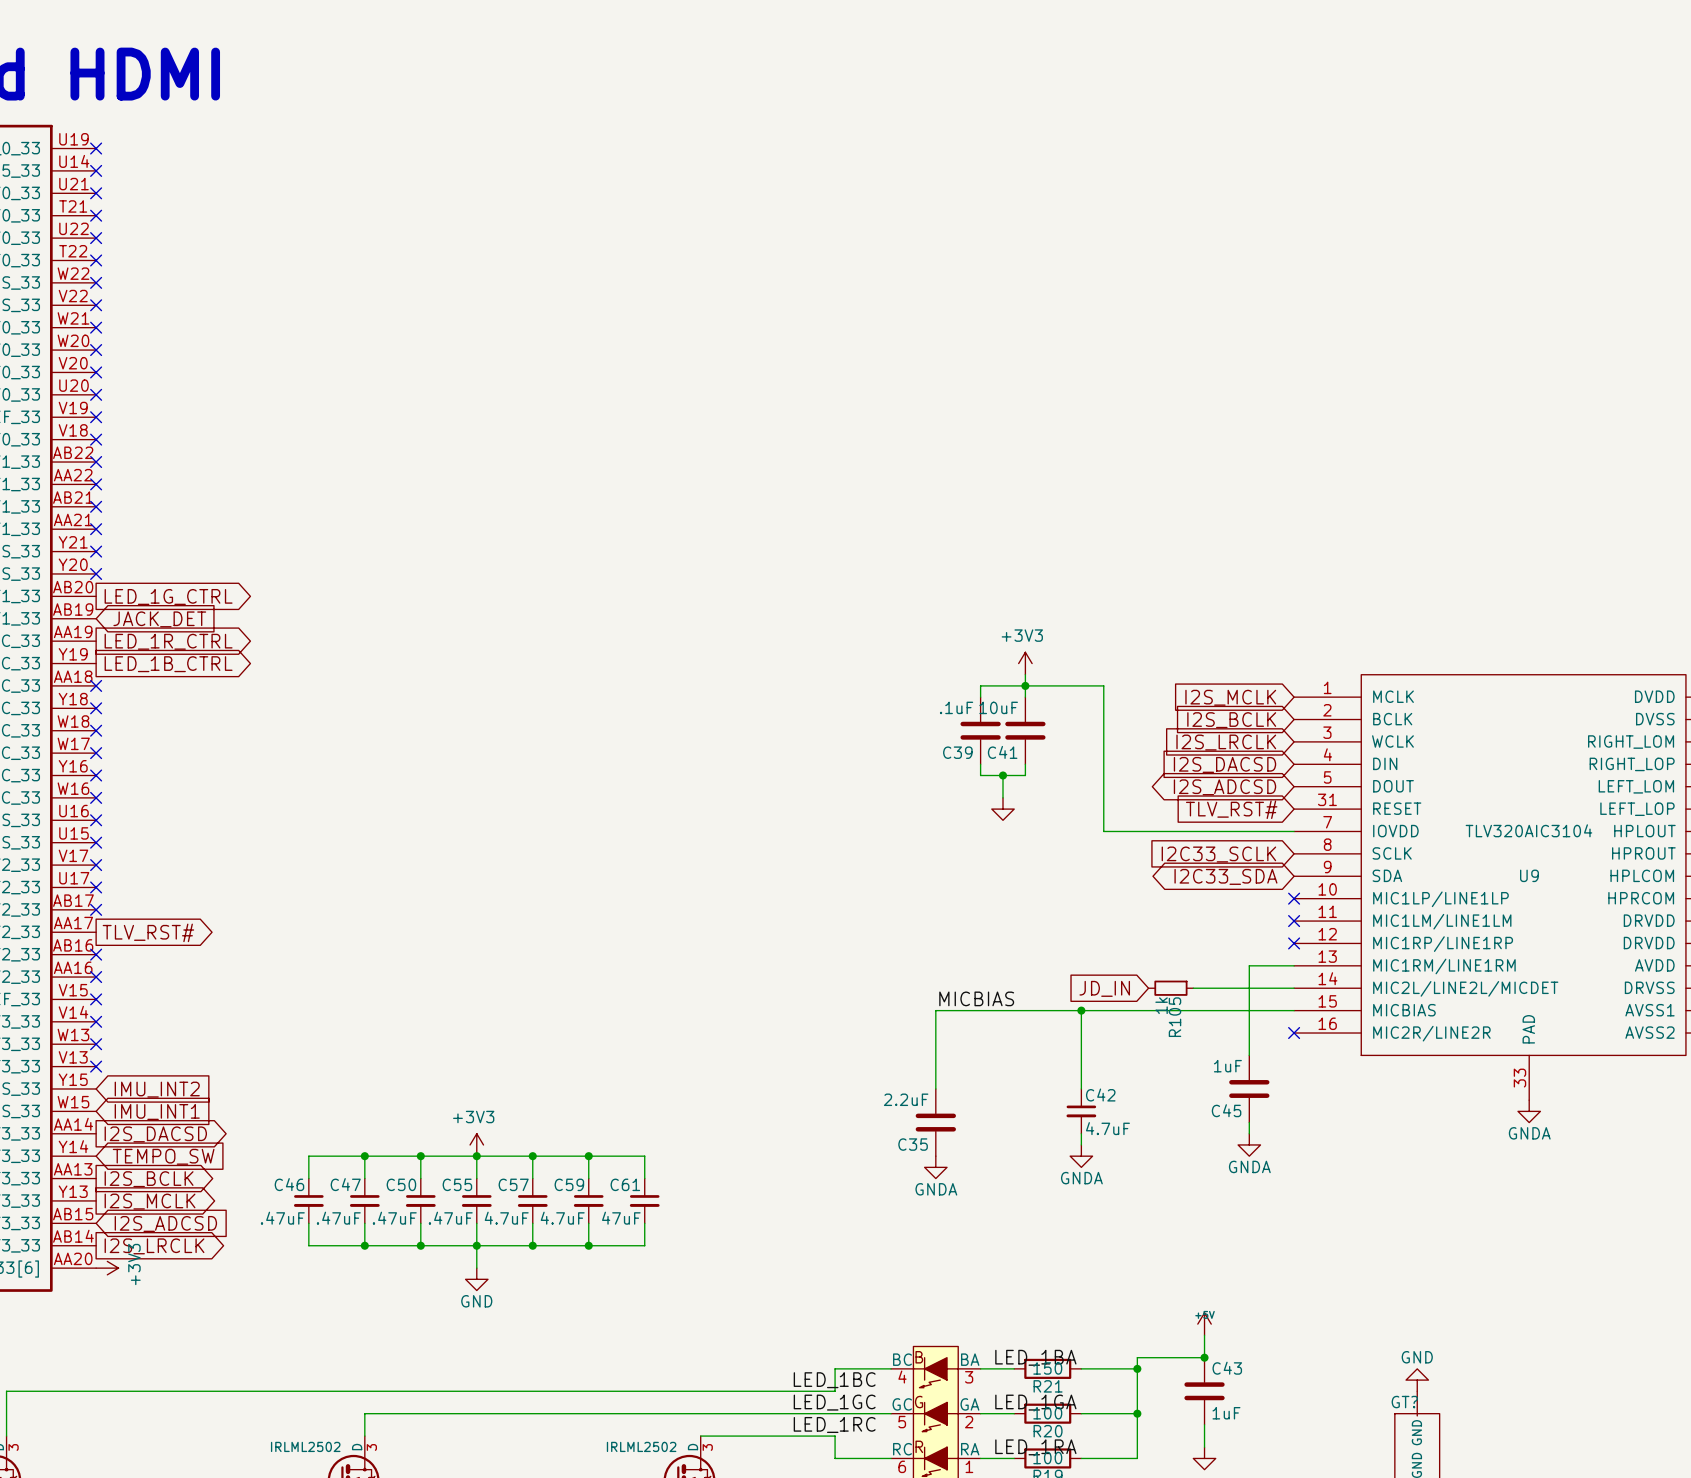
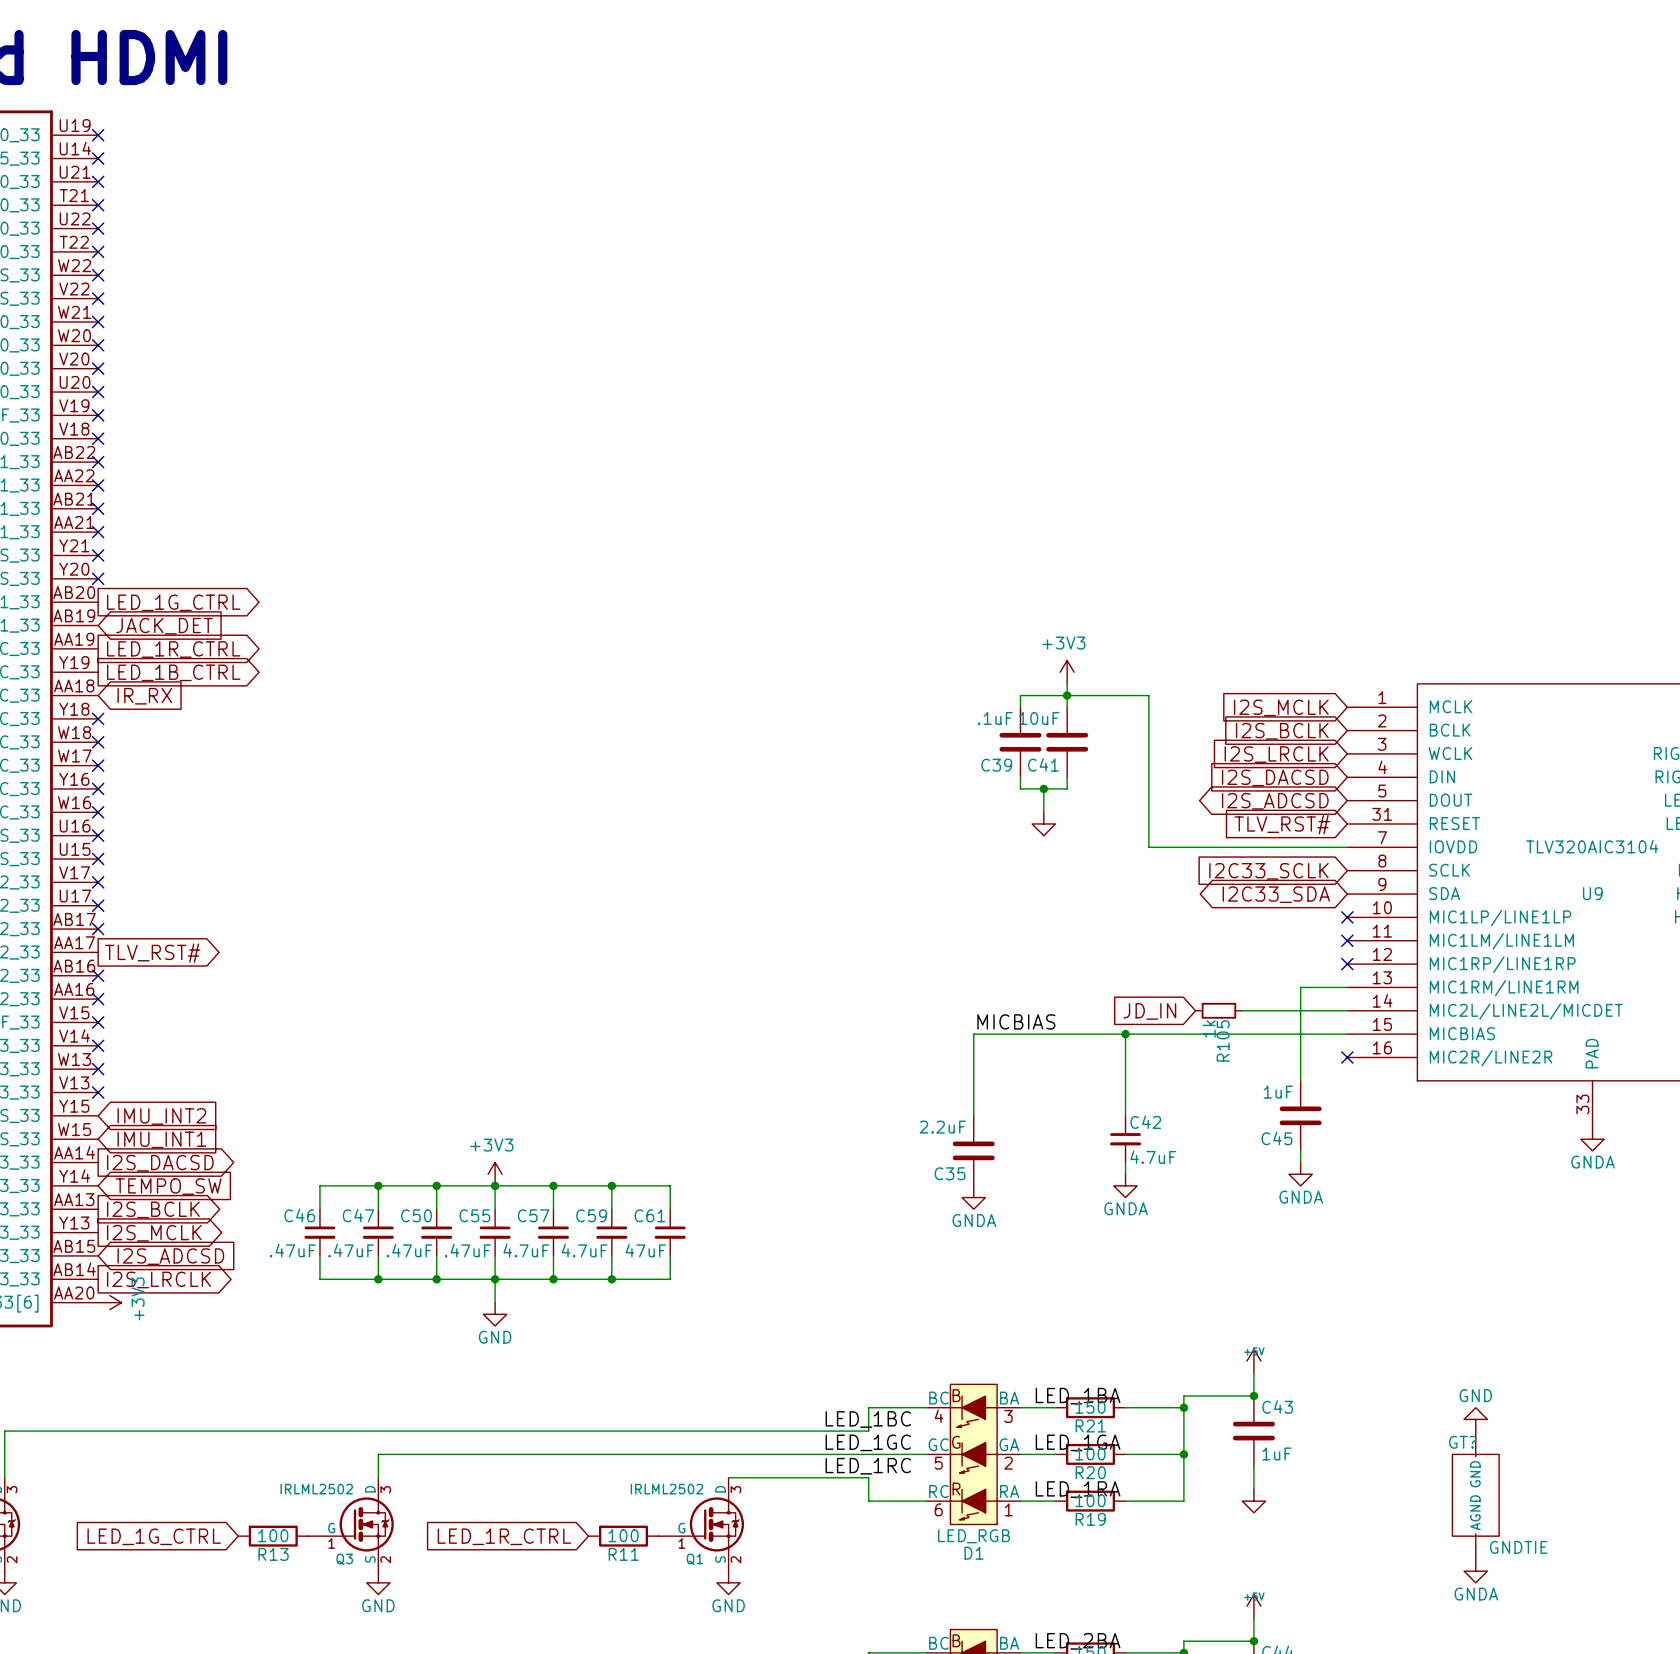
no-connect mark: (96, 685) -> none
global label: none -> IR_RX (144, 696)

